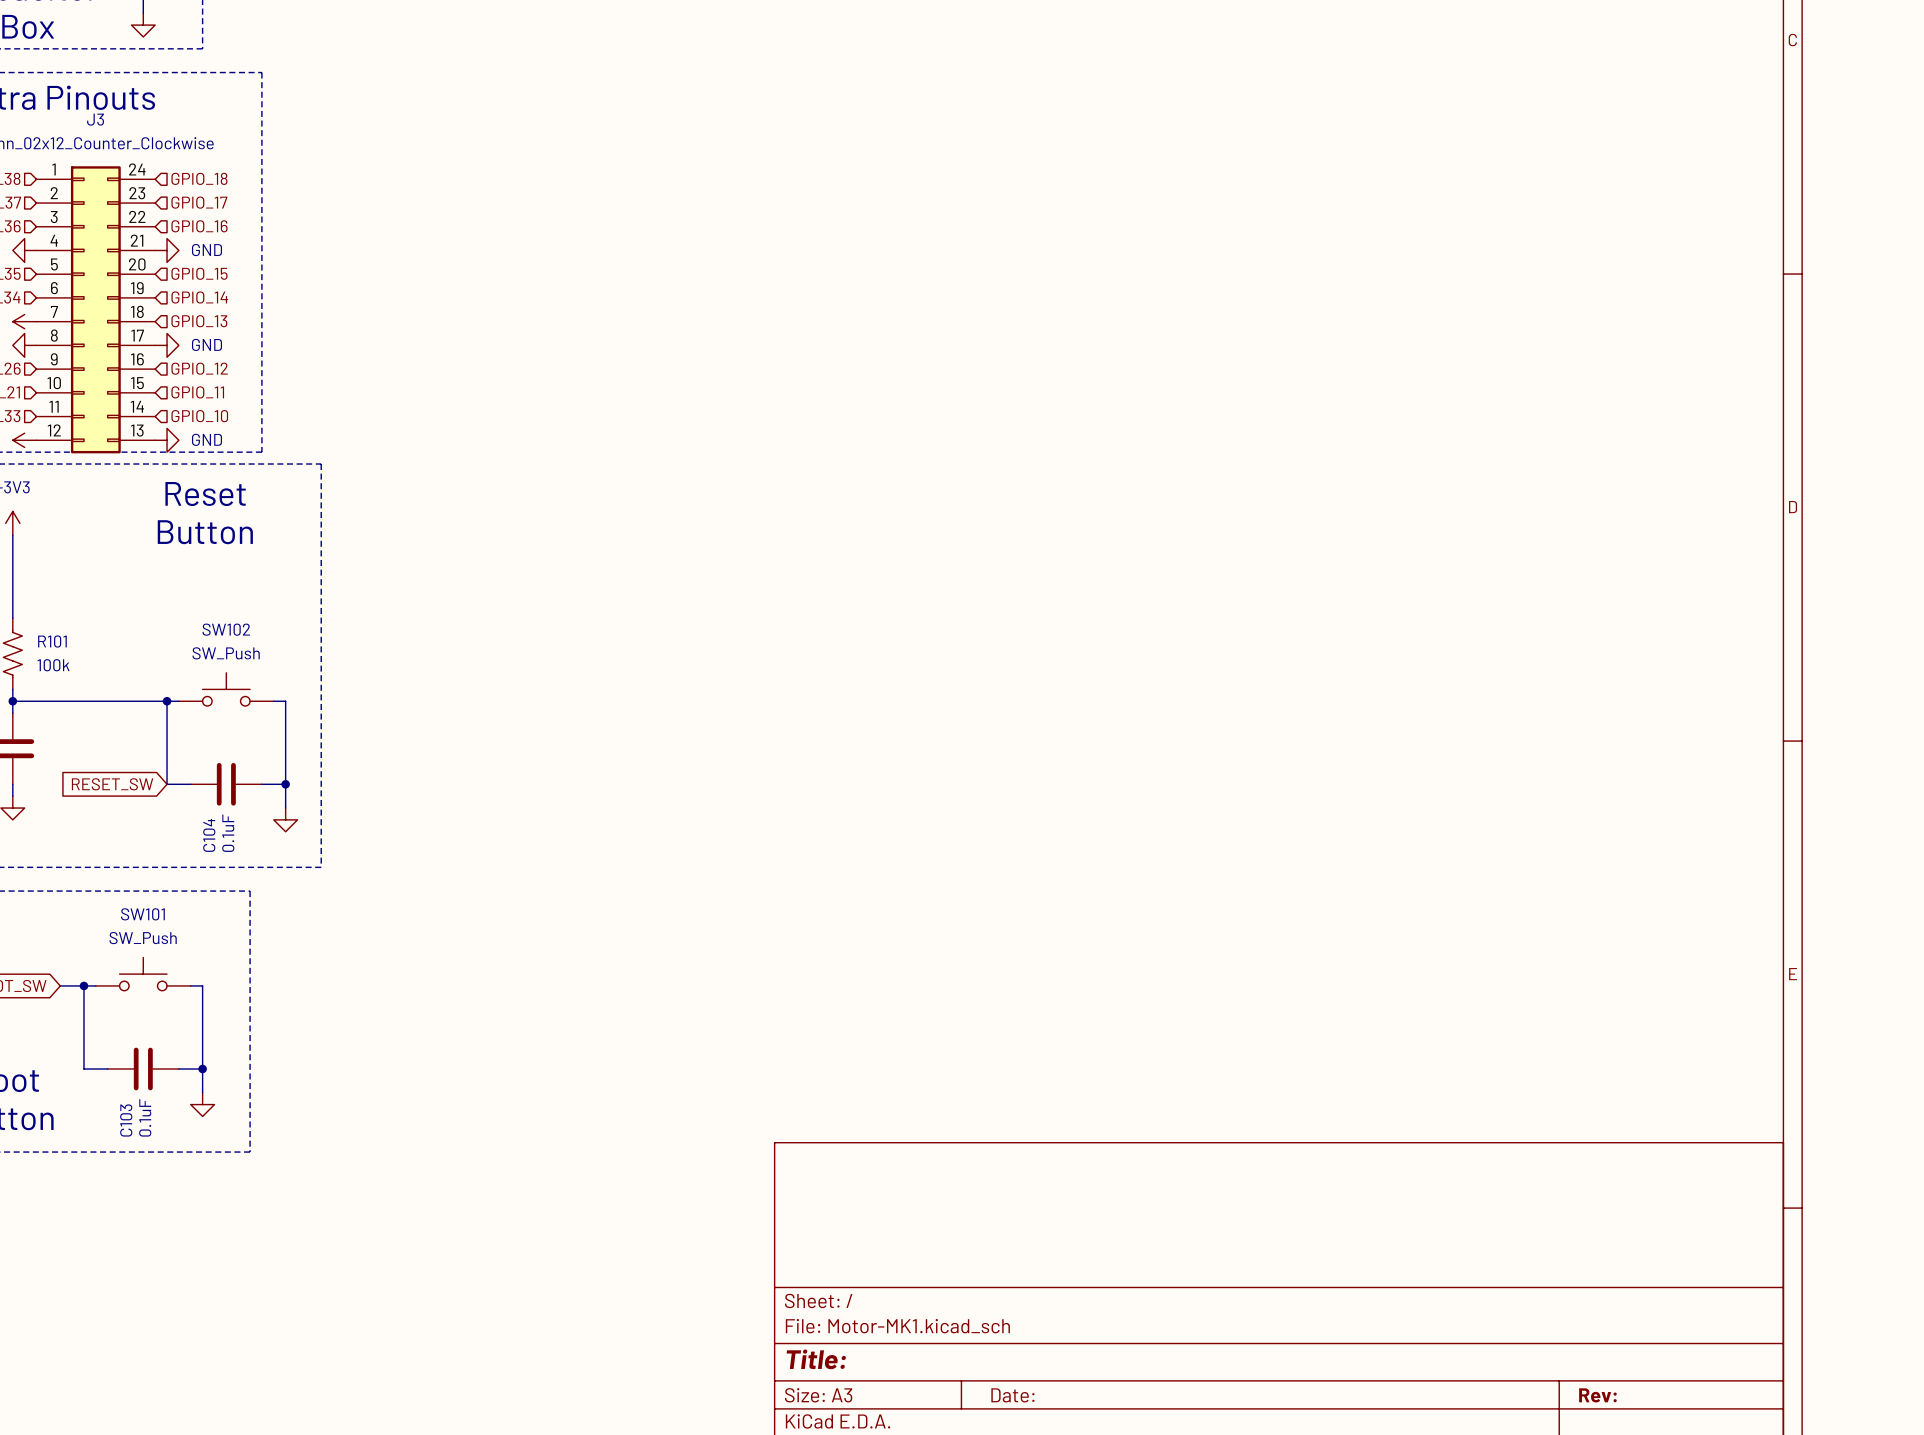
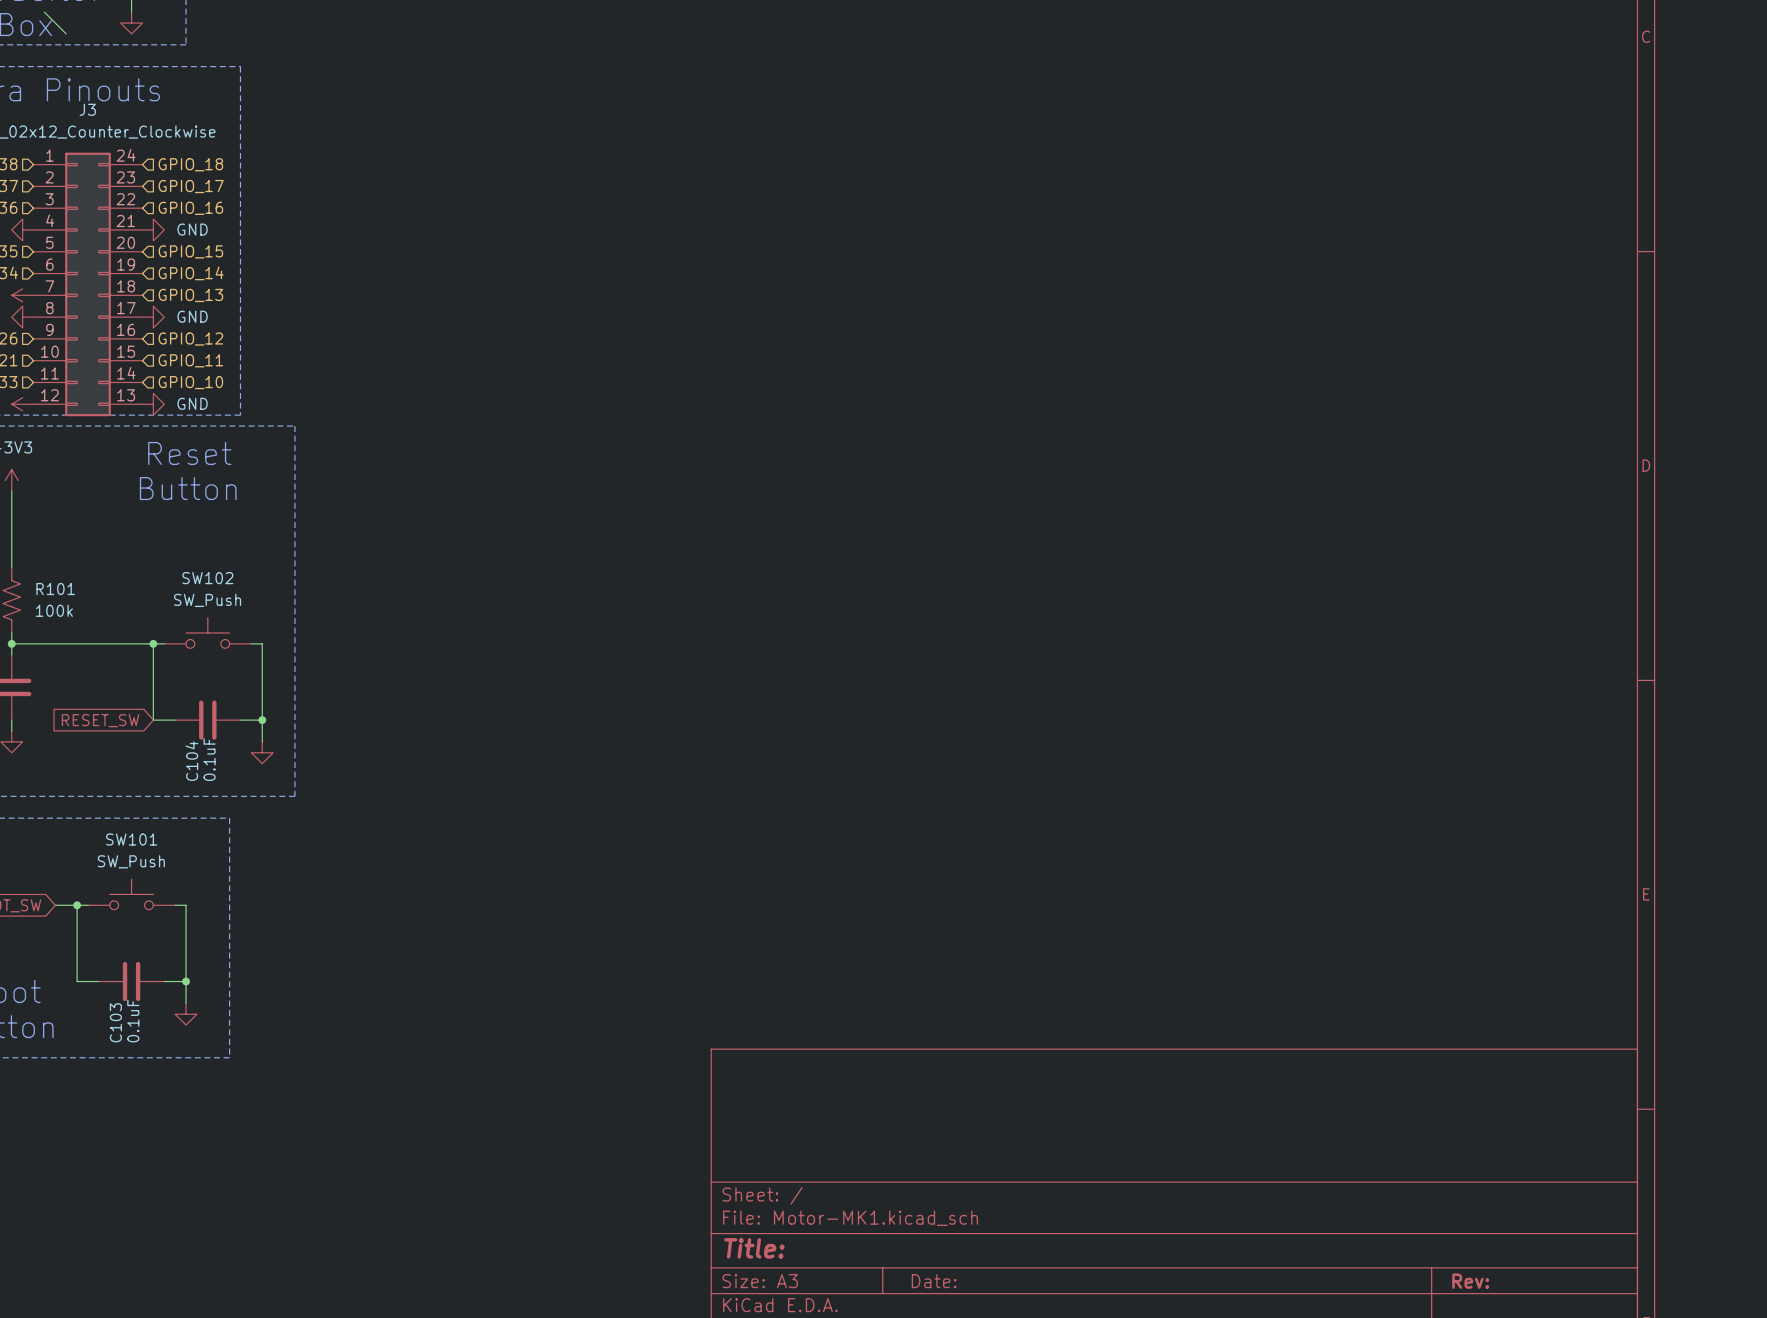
wire: none -> (44, 12) (66, 33)

